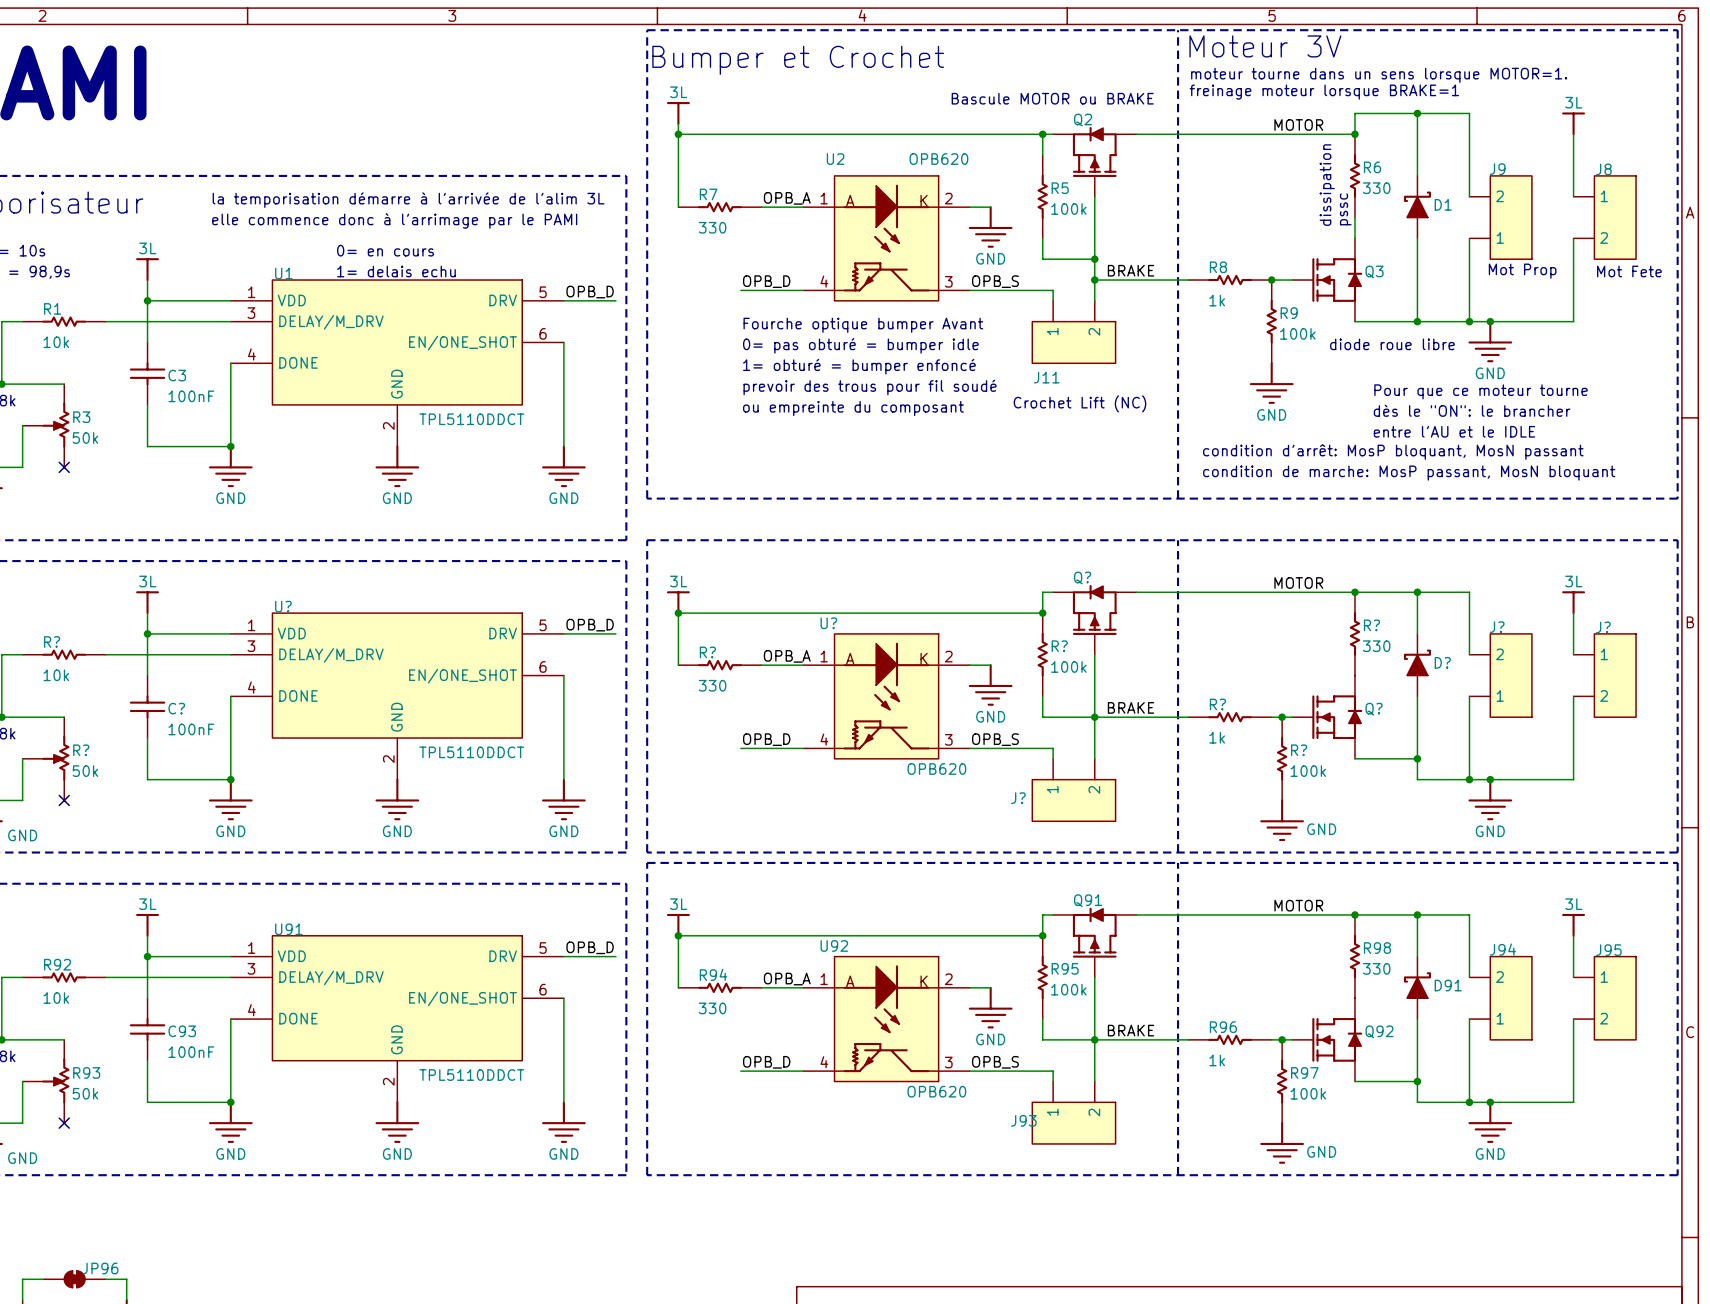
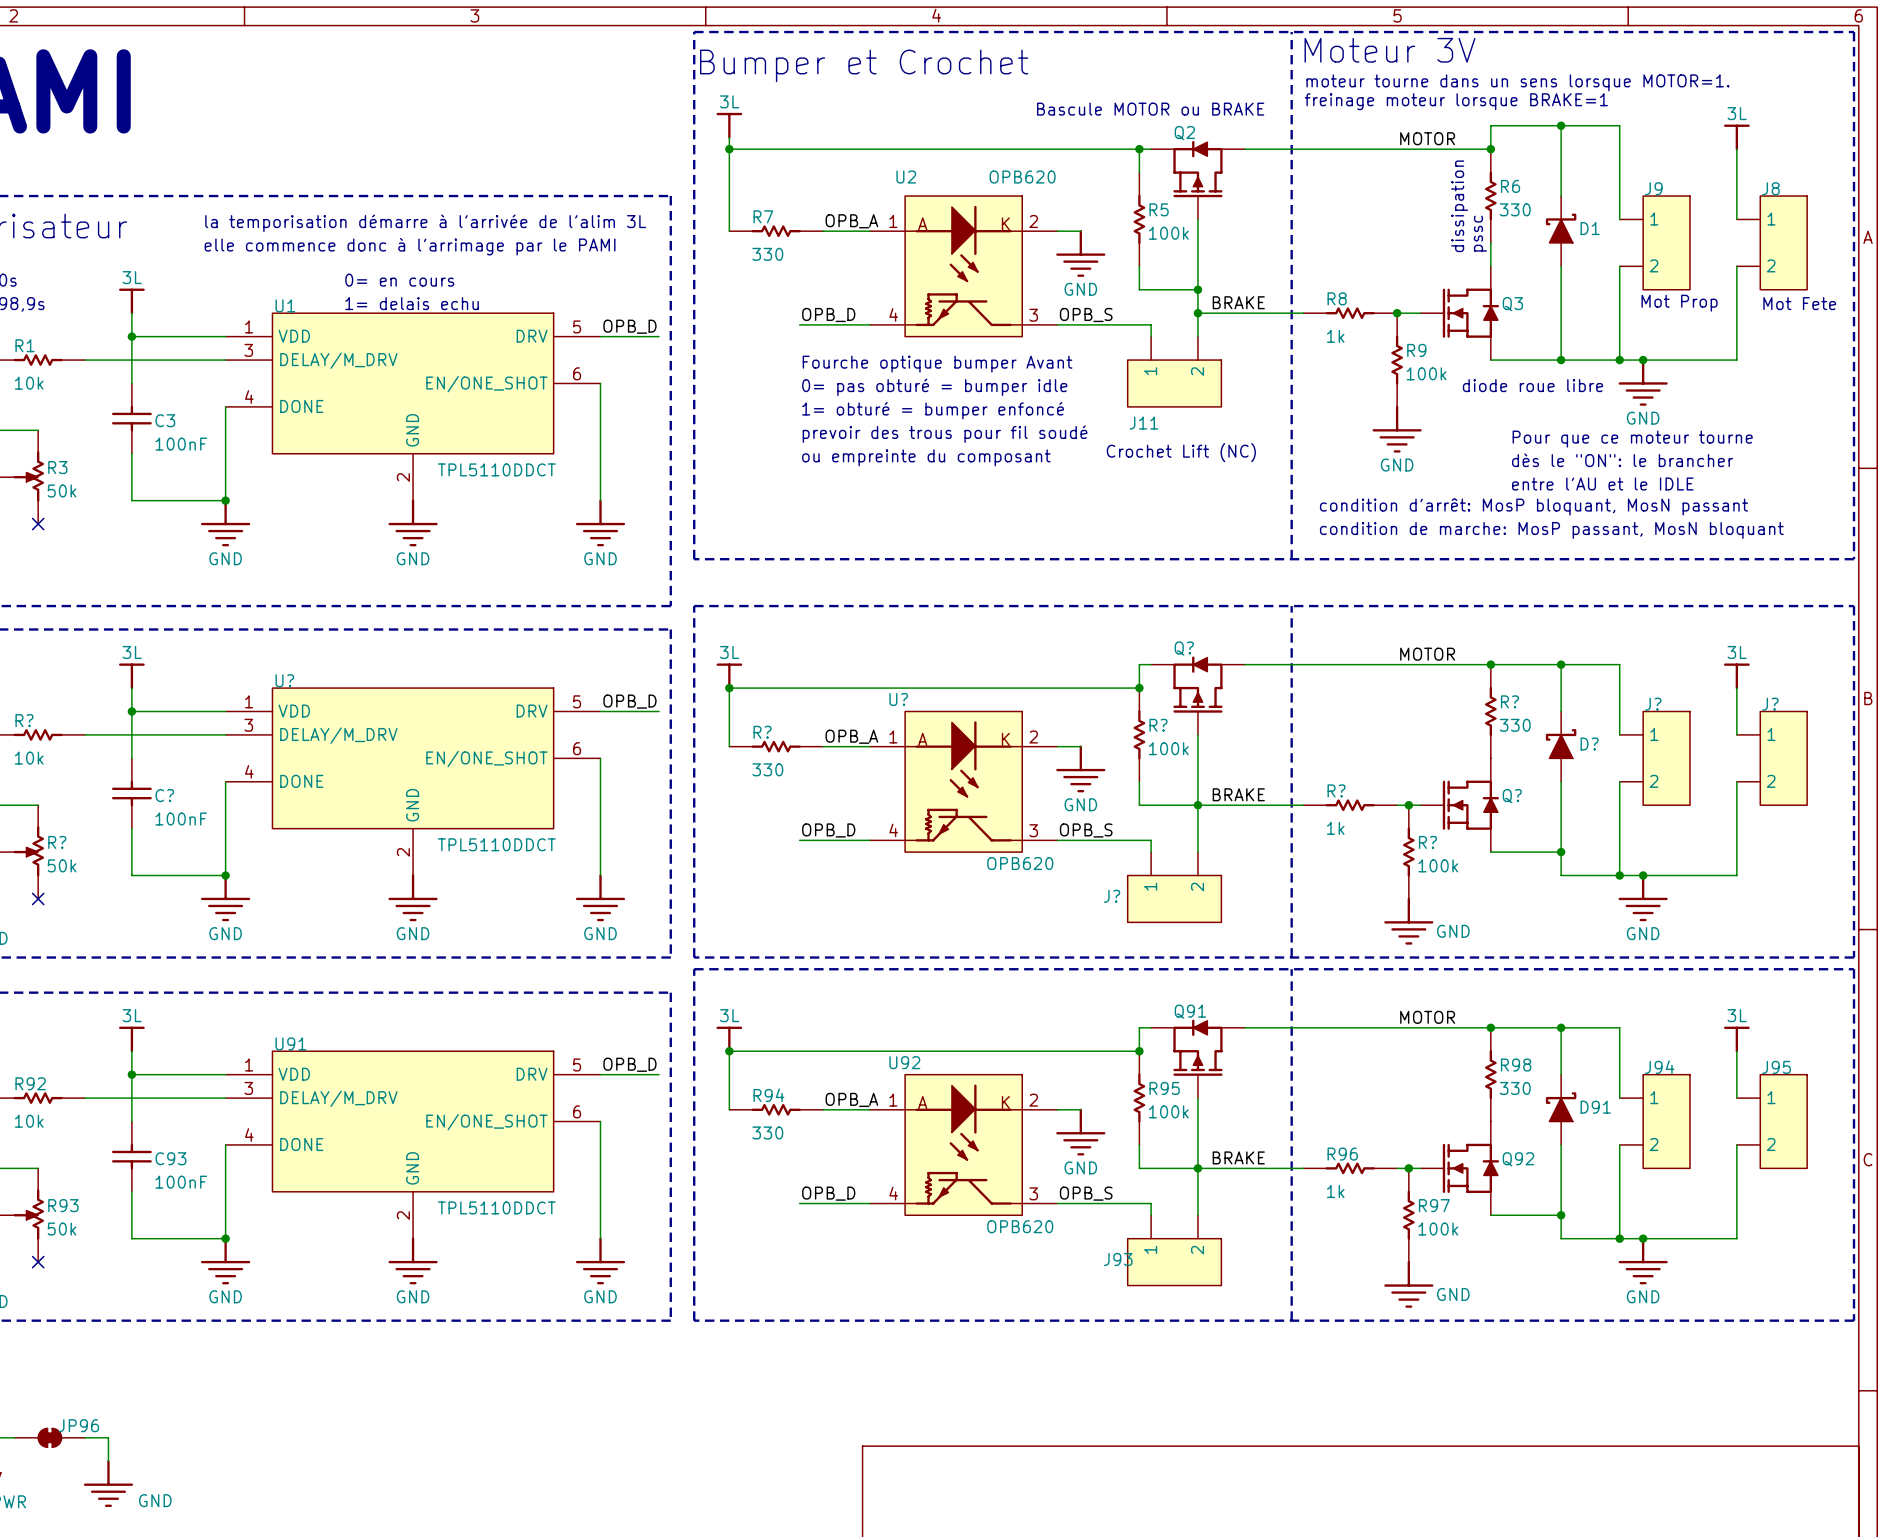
J9 flip: as is (1511, 217) -> up-down (1666, 242)
J? flip: as is (1511, 675) -> up-down (1666, 758)
J94 flip: as is (1511, 998) -> up-down (1666, 1121)

